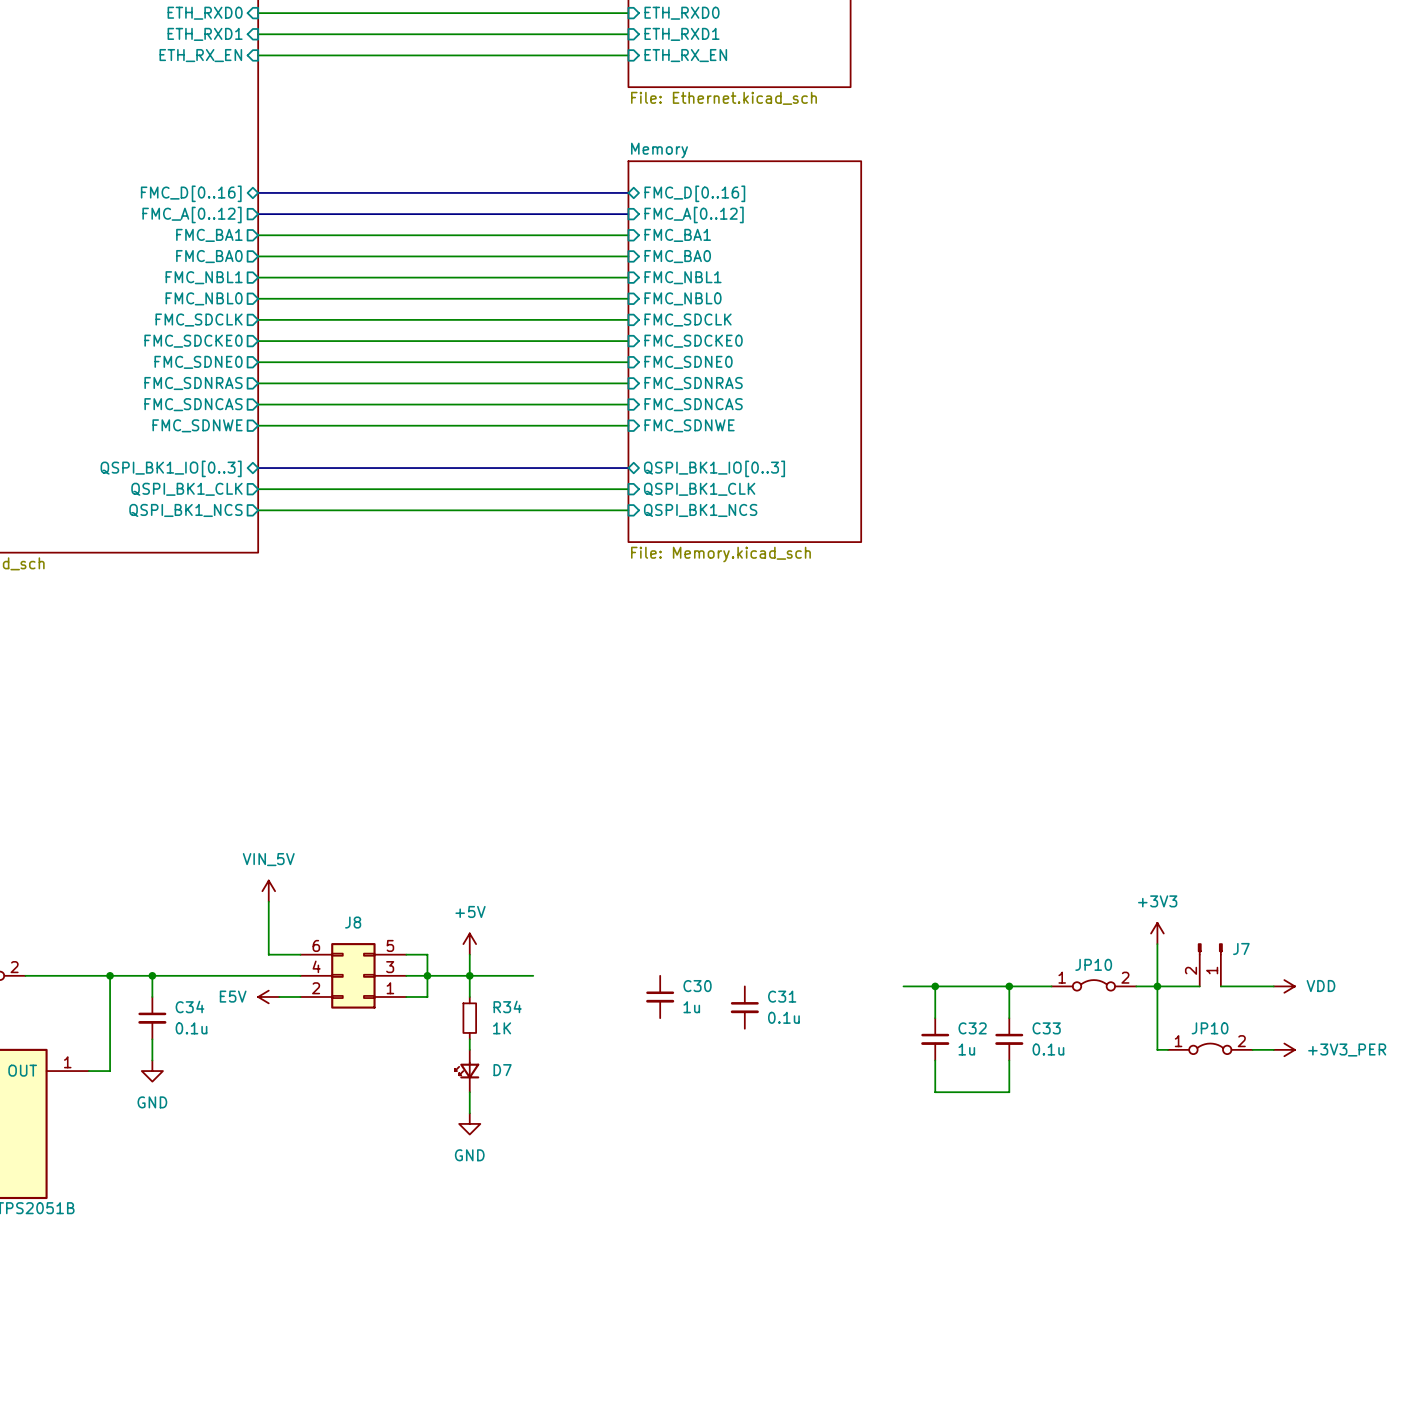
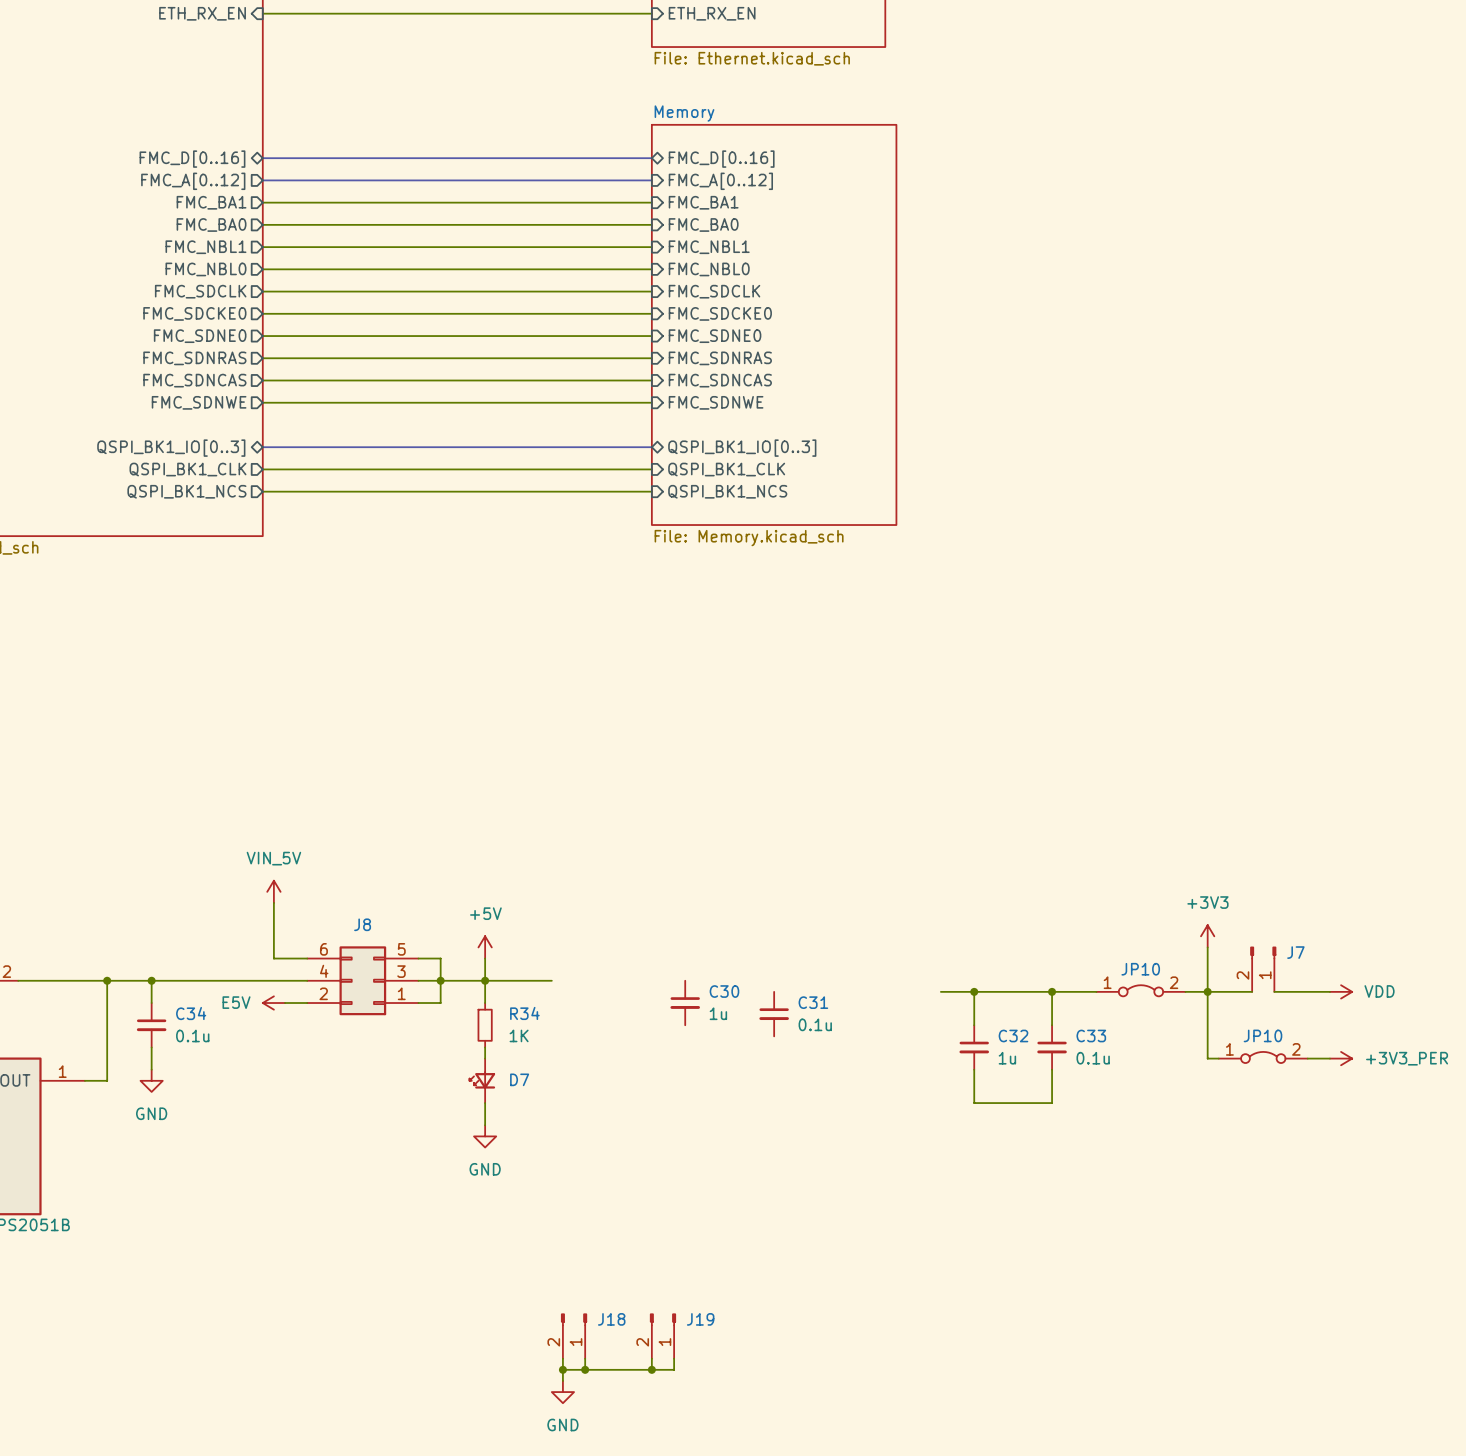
J18: none -> (574, 1336)
J19: none -> (662, 1336)
wire: none -> (562, 1358) (562, 1380)
wire: none -> (585, 1358) (585, 1369)
wire: none -> (651, 1358) (651, 1369)
wire: none -> (674, 1358) (674, 1369) (562, 1369)
junction: none -> (562, 1369)
junction: none -> (585, 1369)
junction: none -> (651, 1369)
power symbol: none -> GND (562, 1392)

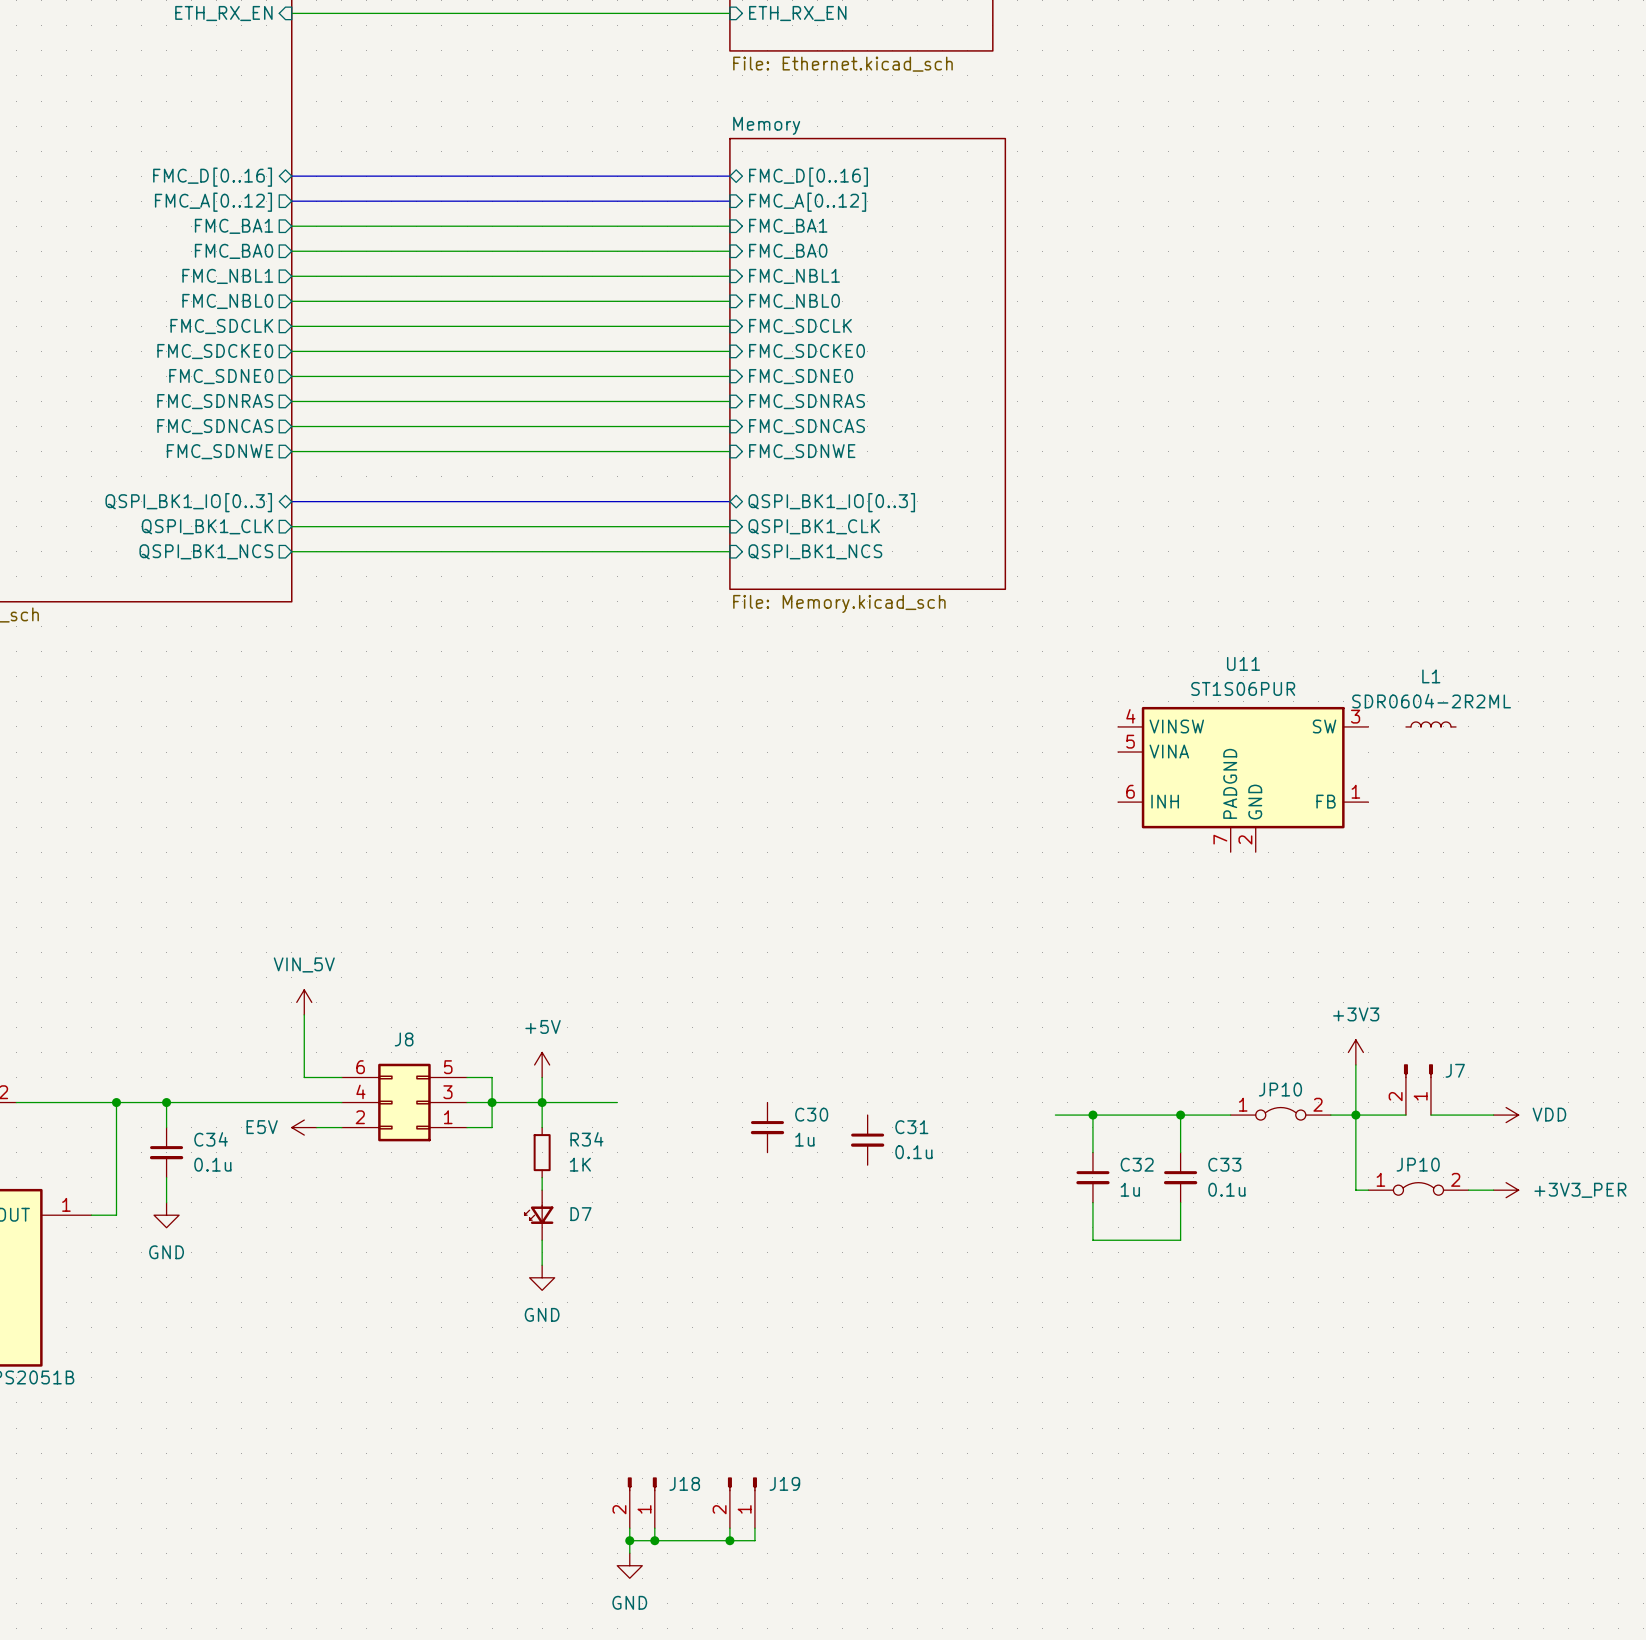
L1: none -> SDR0604-2R2ML (1430, 724)
U11: none -> ST1S06PUR (1243, 779)

